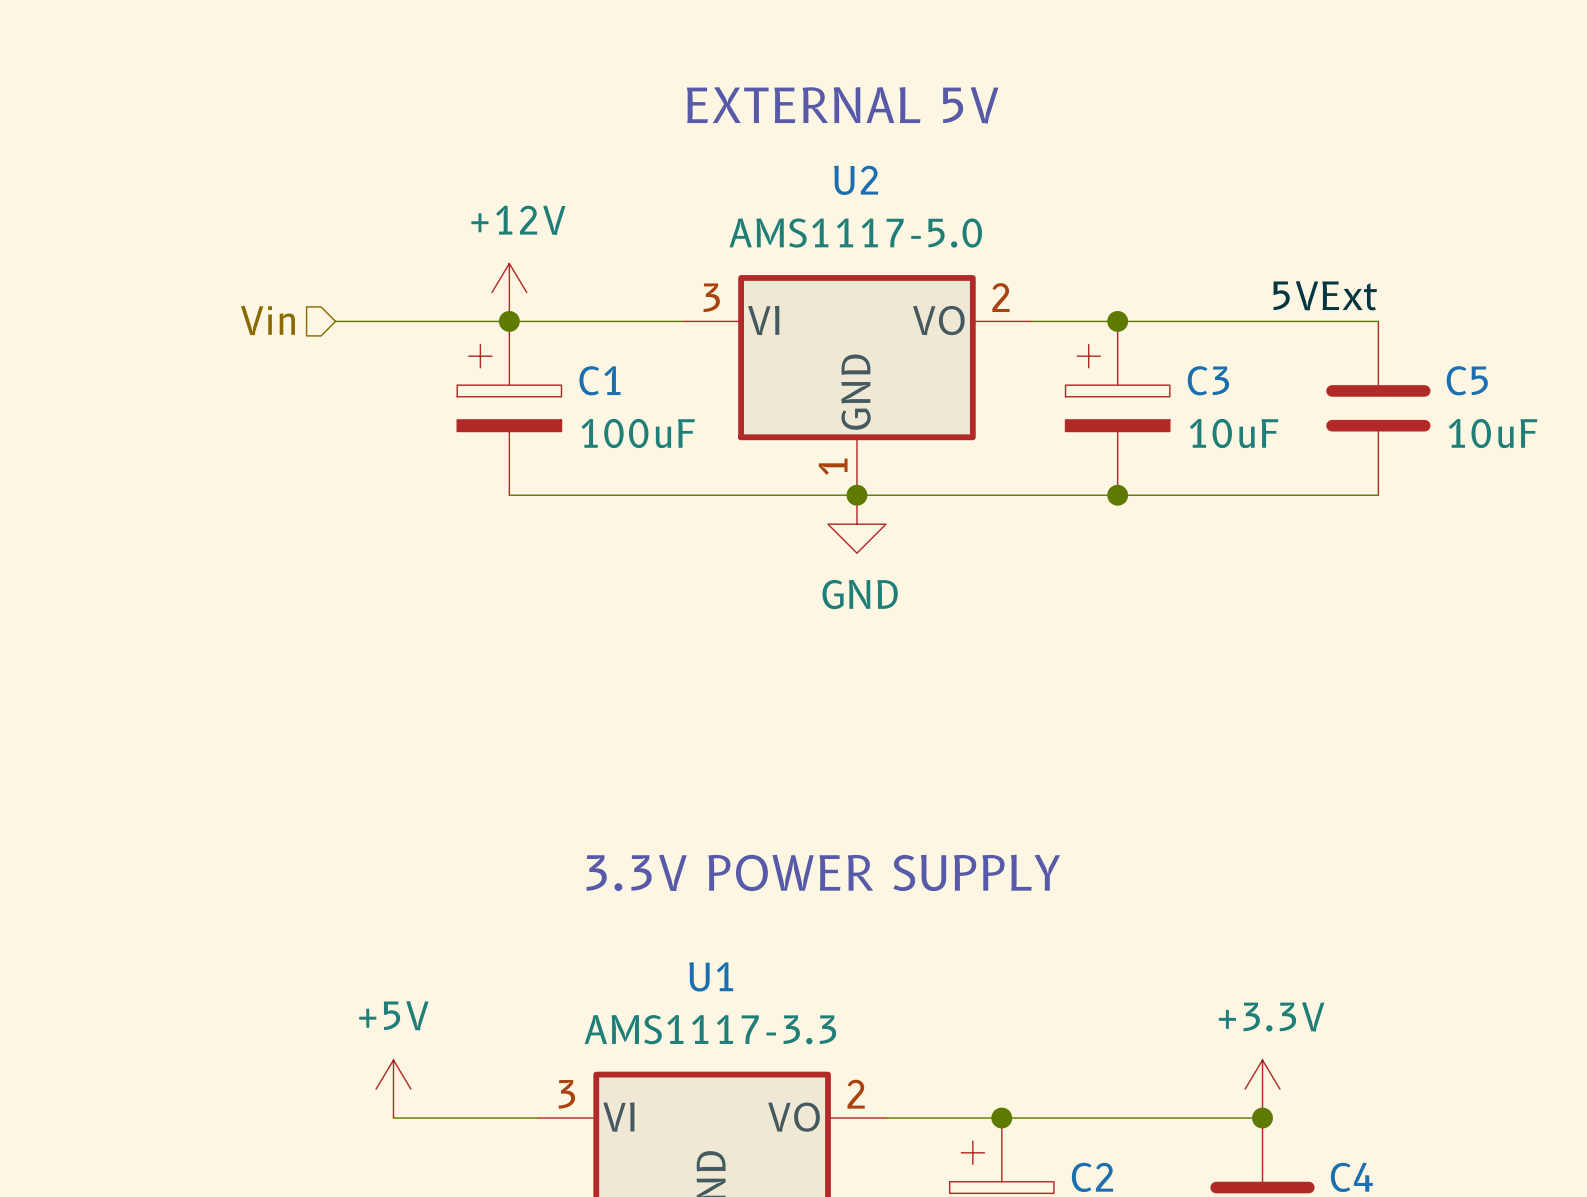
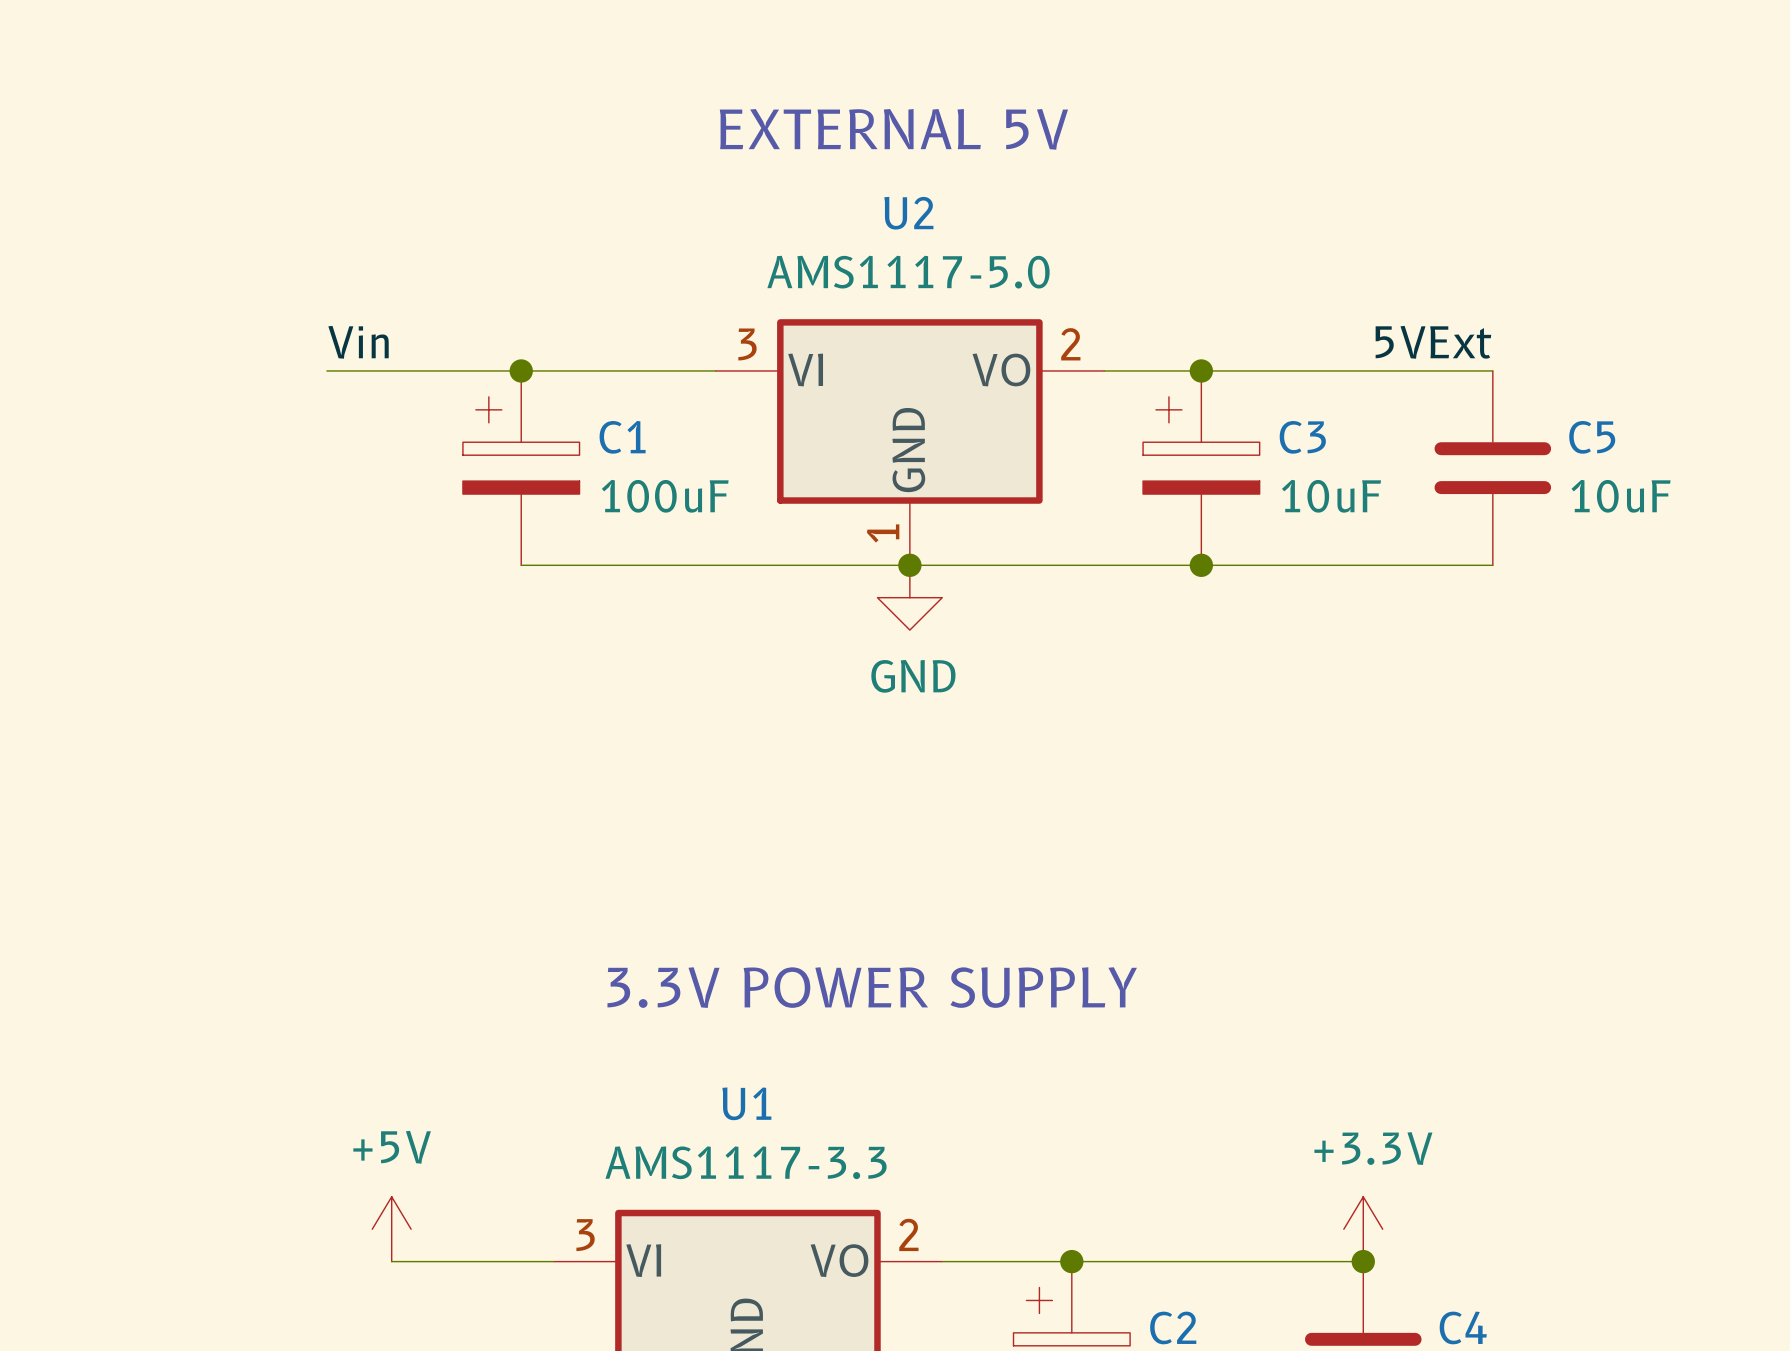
power symbol: +12V (509, 292) -> none
label: none -> Vin (358, 342)
hierarchical label: Vin (267, 320) -> none

